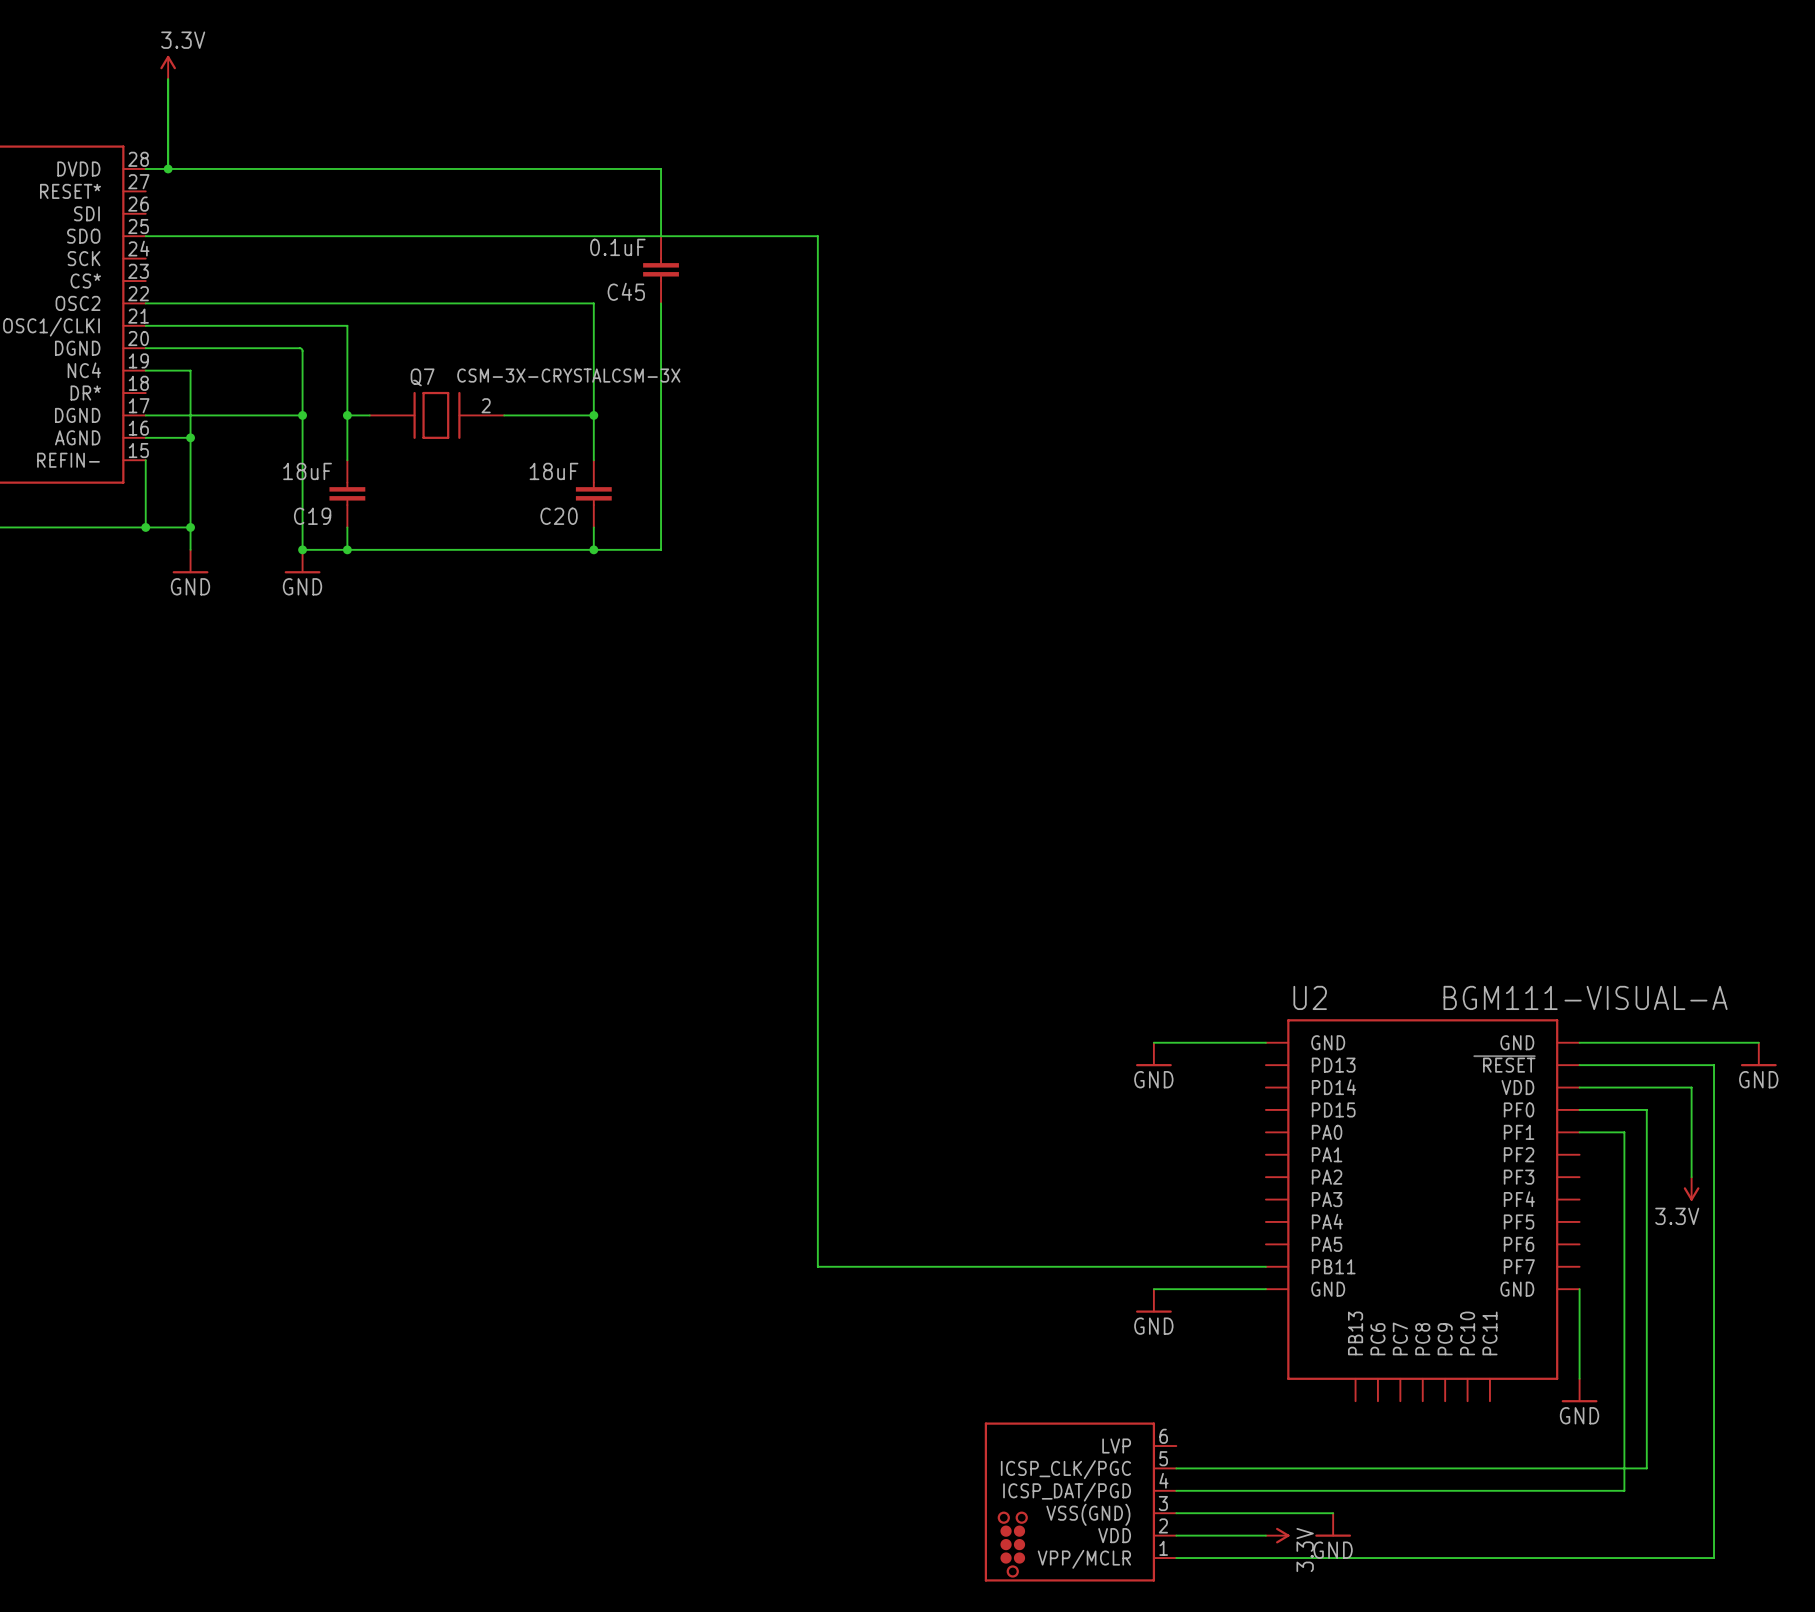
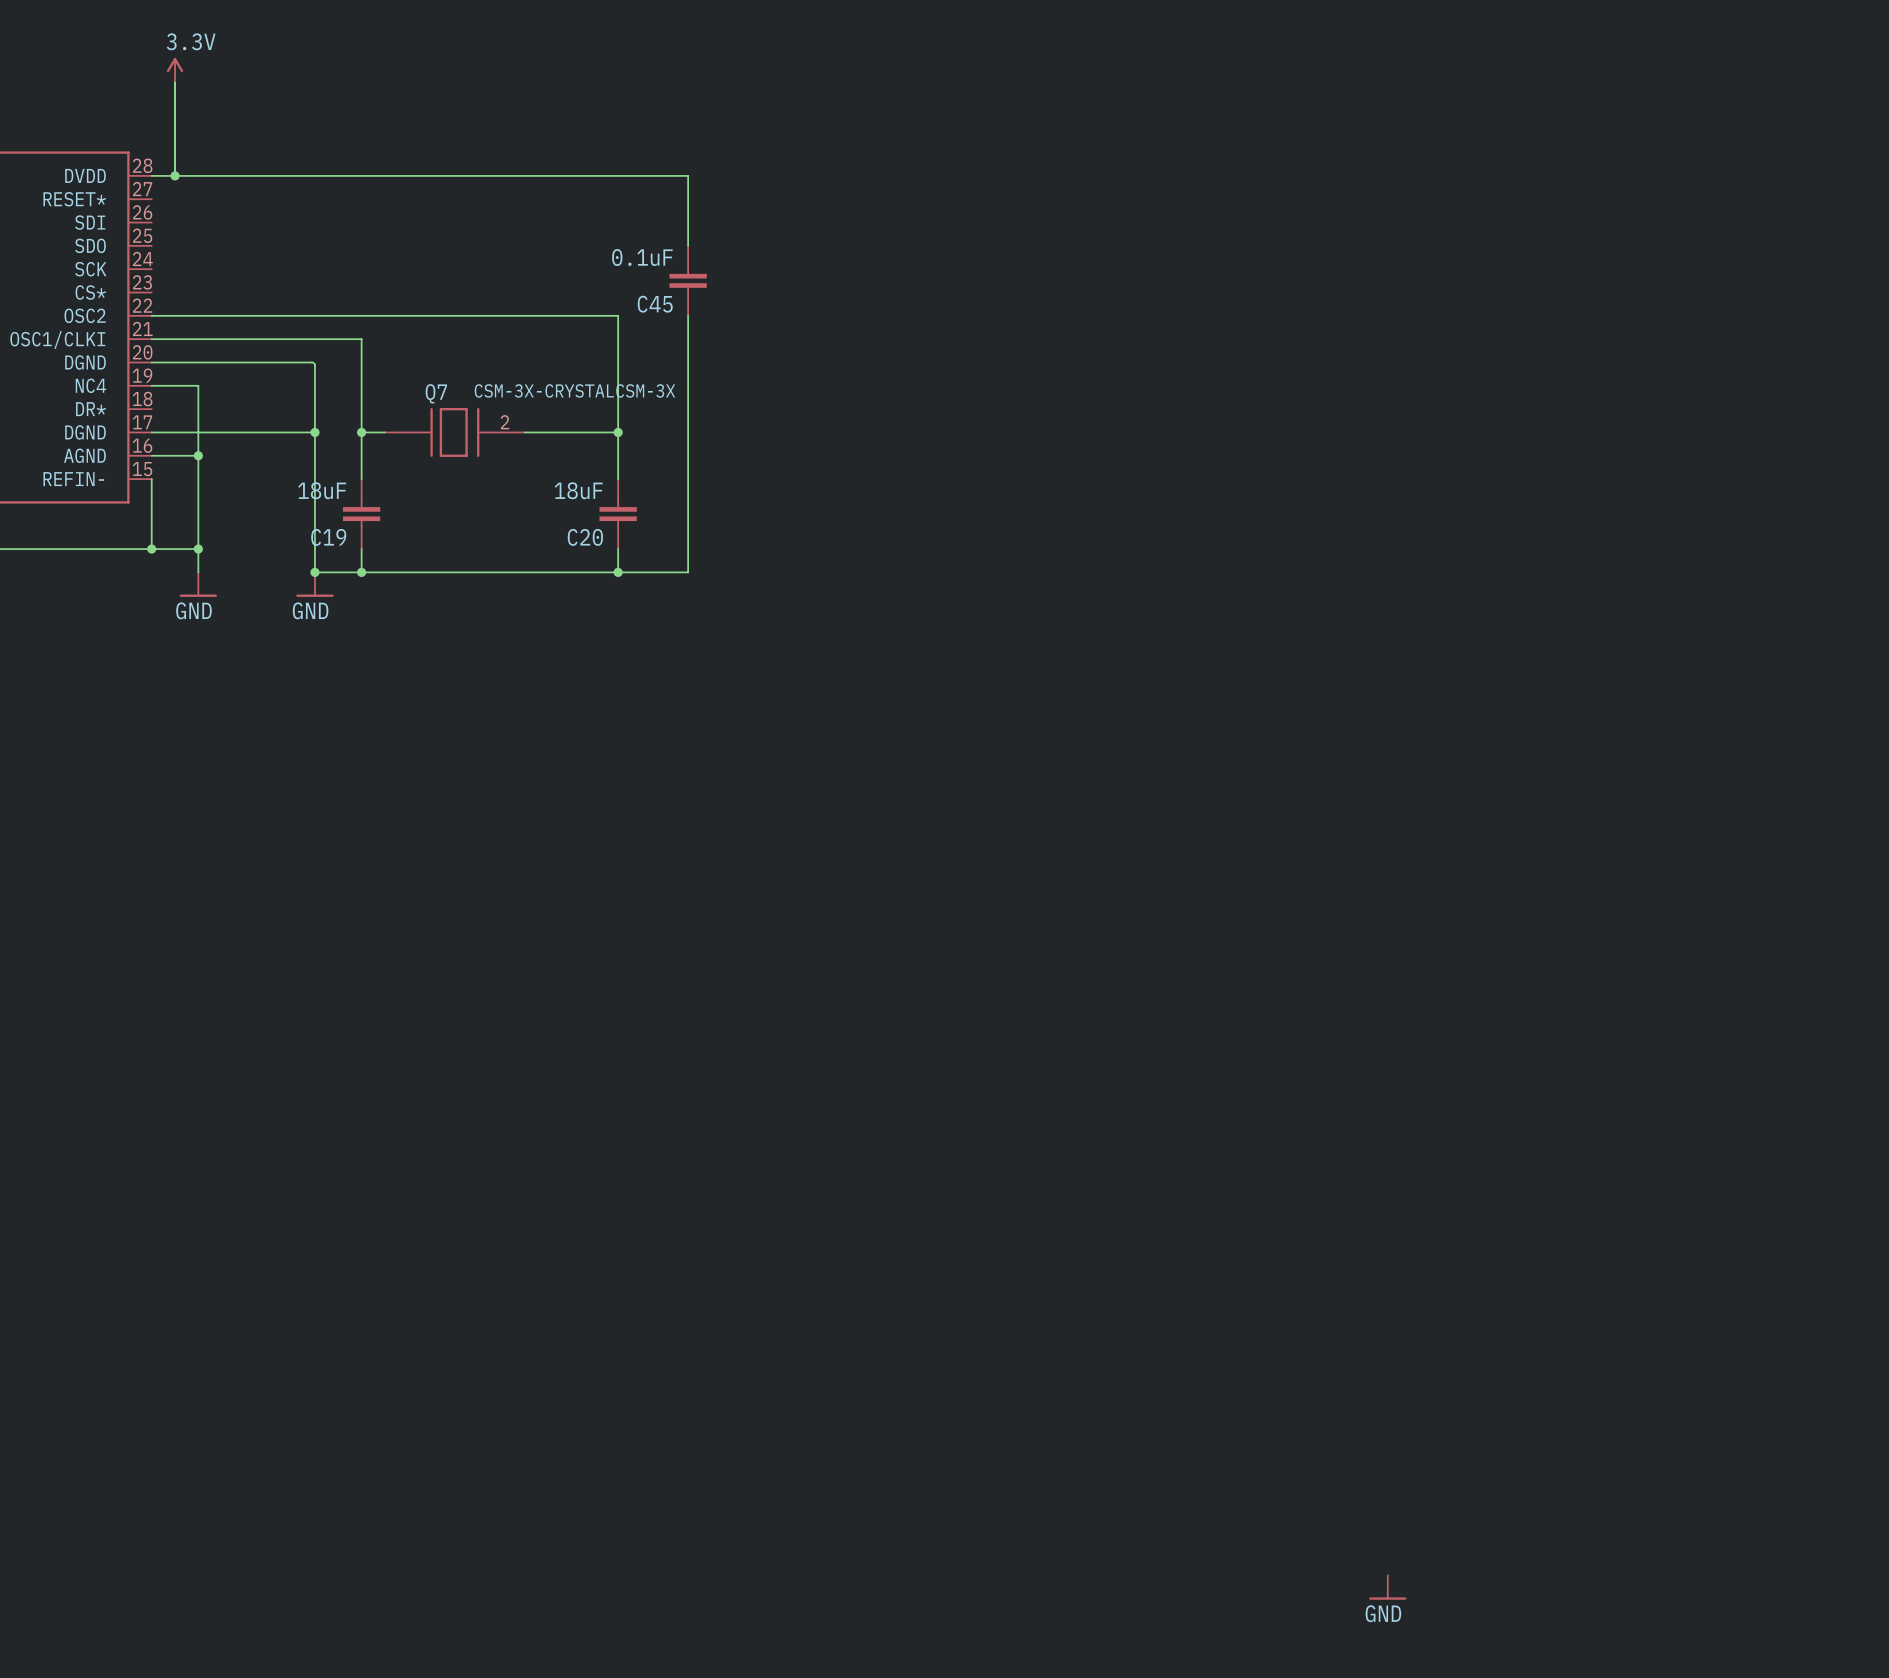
wire: (145, 236) (817, 236) (817, 1266) (1265, 1266) -> none
wire: (1153, 1042) (1265, 1042) -> none
wire: (1579, 1042) (1758, 1042) -> none
power symbol: GND (1153, 1054) -> none
power symbol: GND (1758, 1054) -> none
wire: (1579, 1065) (1714, 1065) (1714, 1558) (1176, 1558) -> none
wire: (1579, 1087) (1691, 1087) (1691, 1177) -> none
wire: (1579, 1109) (1646, 1109) (1646, 1468) (1176, 1468) -> none
wire: (1579, 1132) (1624, 1132) (1624, 1490) (1176, 1490) -> none
power symbol: 3.3V (1691, 1188) -> none
U2: BGM111-VISUAL-A (1422, 1210) -> none
wire: (1153, 1289) (1265, 1289) -> none
wire: (1579, 1289) (1579, 1378) -> none
power symbol: GND (1153, 1300) -> none
power symbol: GND (1579, 1390) -> none
part: (1080, 1502) -> none
wire: (1176, 1513) (1333, 1513) -> none
wire: (1176, 1535) (1265, 1535) -> none
power symbol: 3.3V (1277, 1535) -> none

